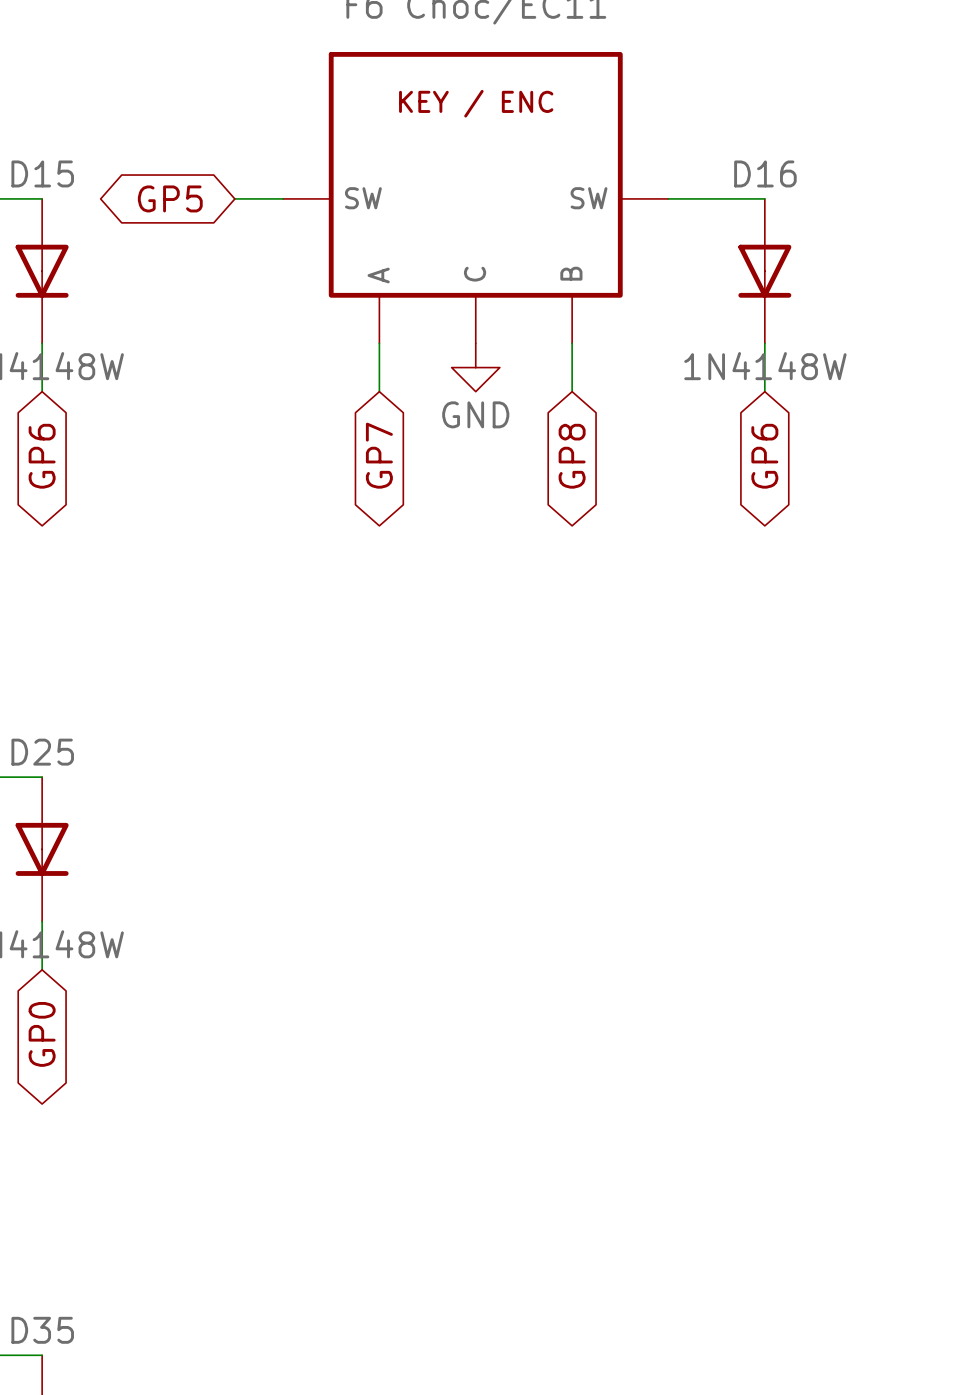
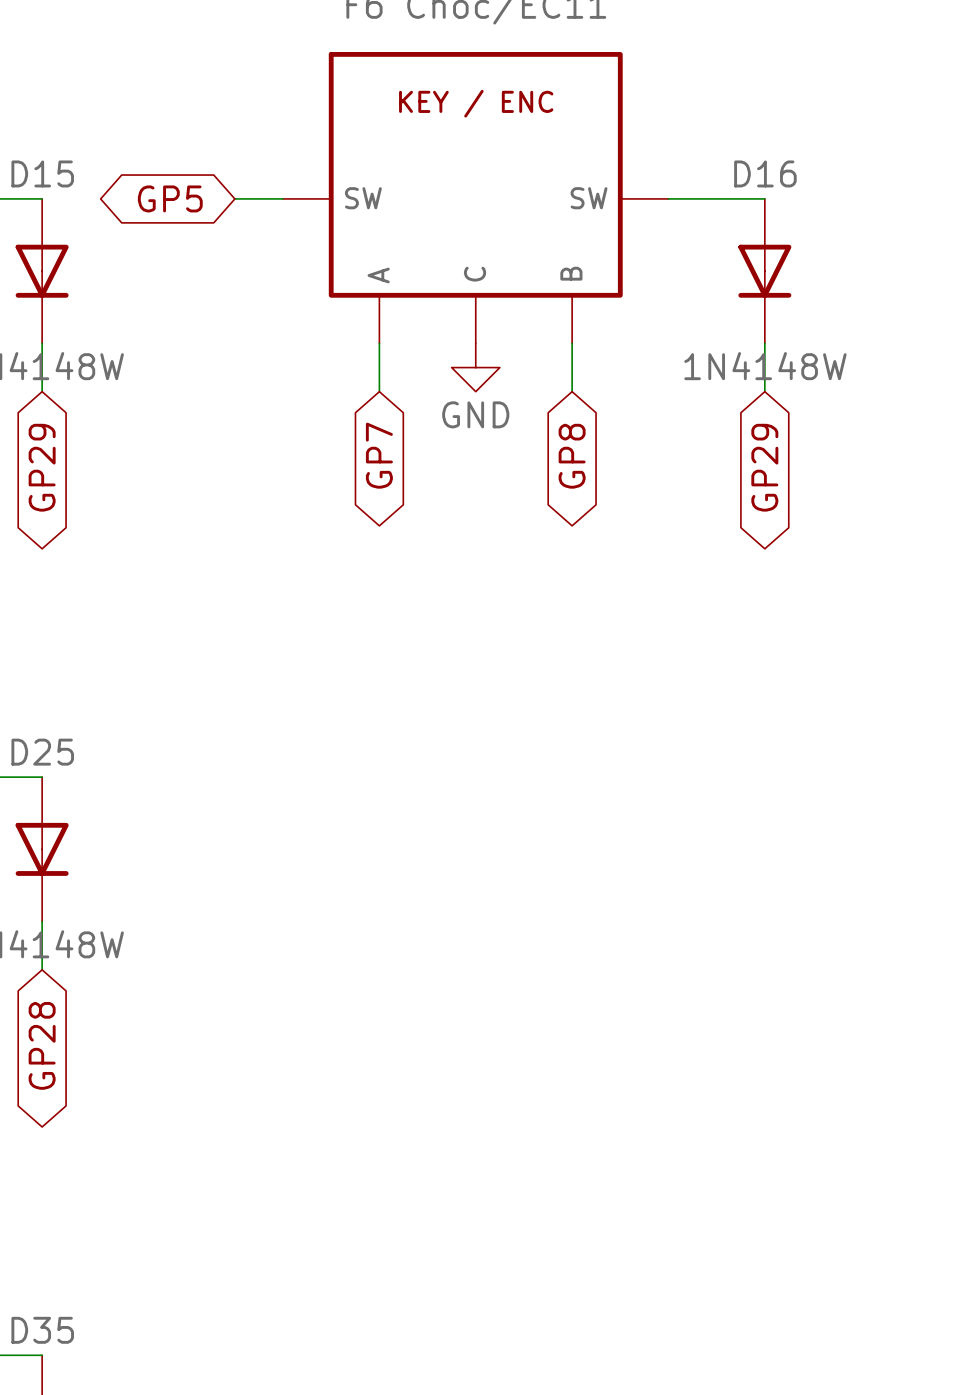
global label: GP6 (42, 456) -> GP29 (42, 467)
global label: GP6 (764, 456) -> GP29 (764, 467)
global label: GP0 (42, 1034) -> GP28 (42, 1045)

